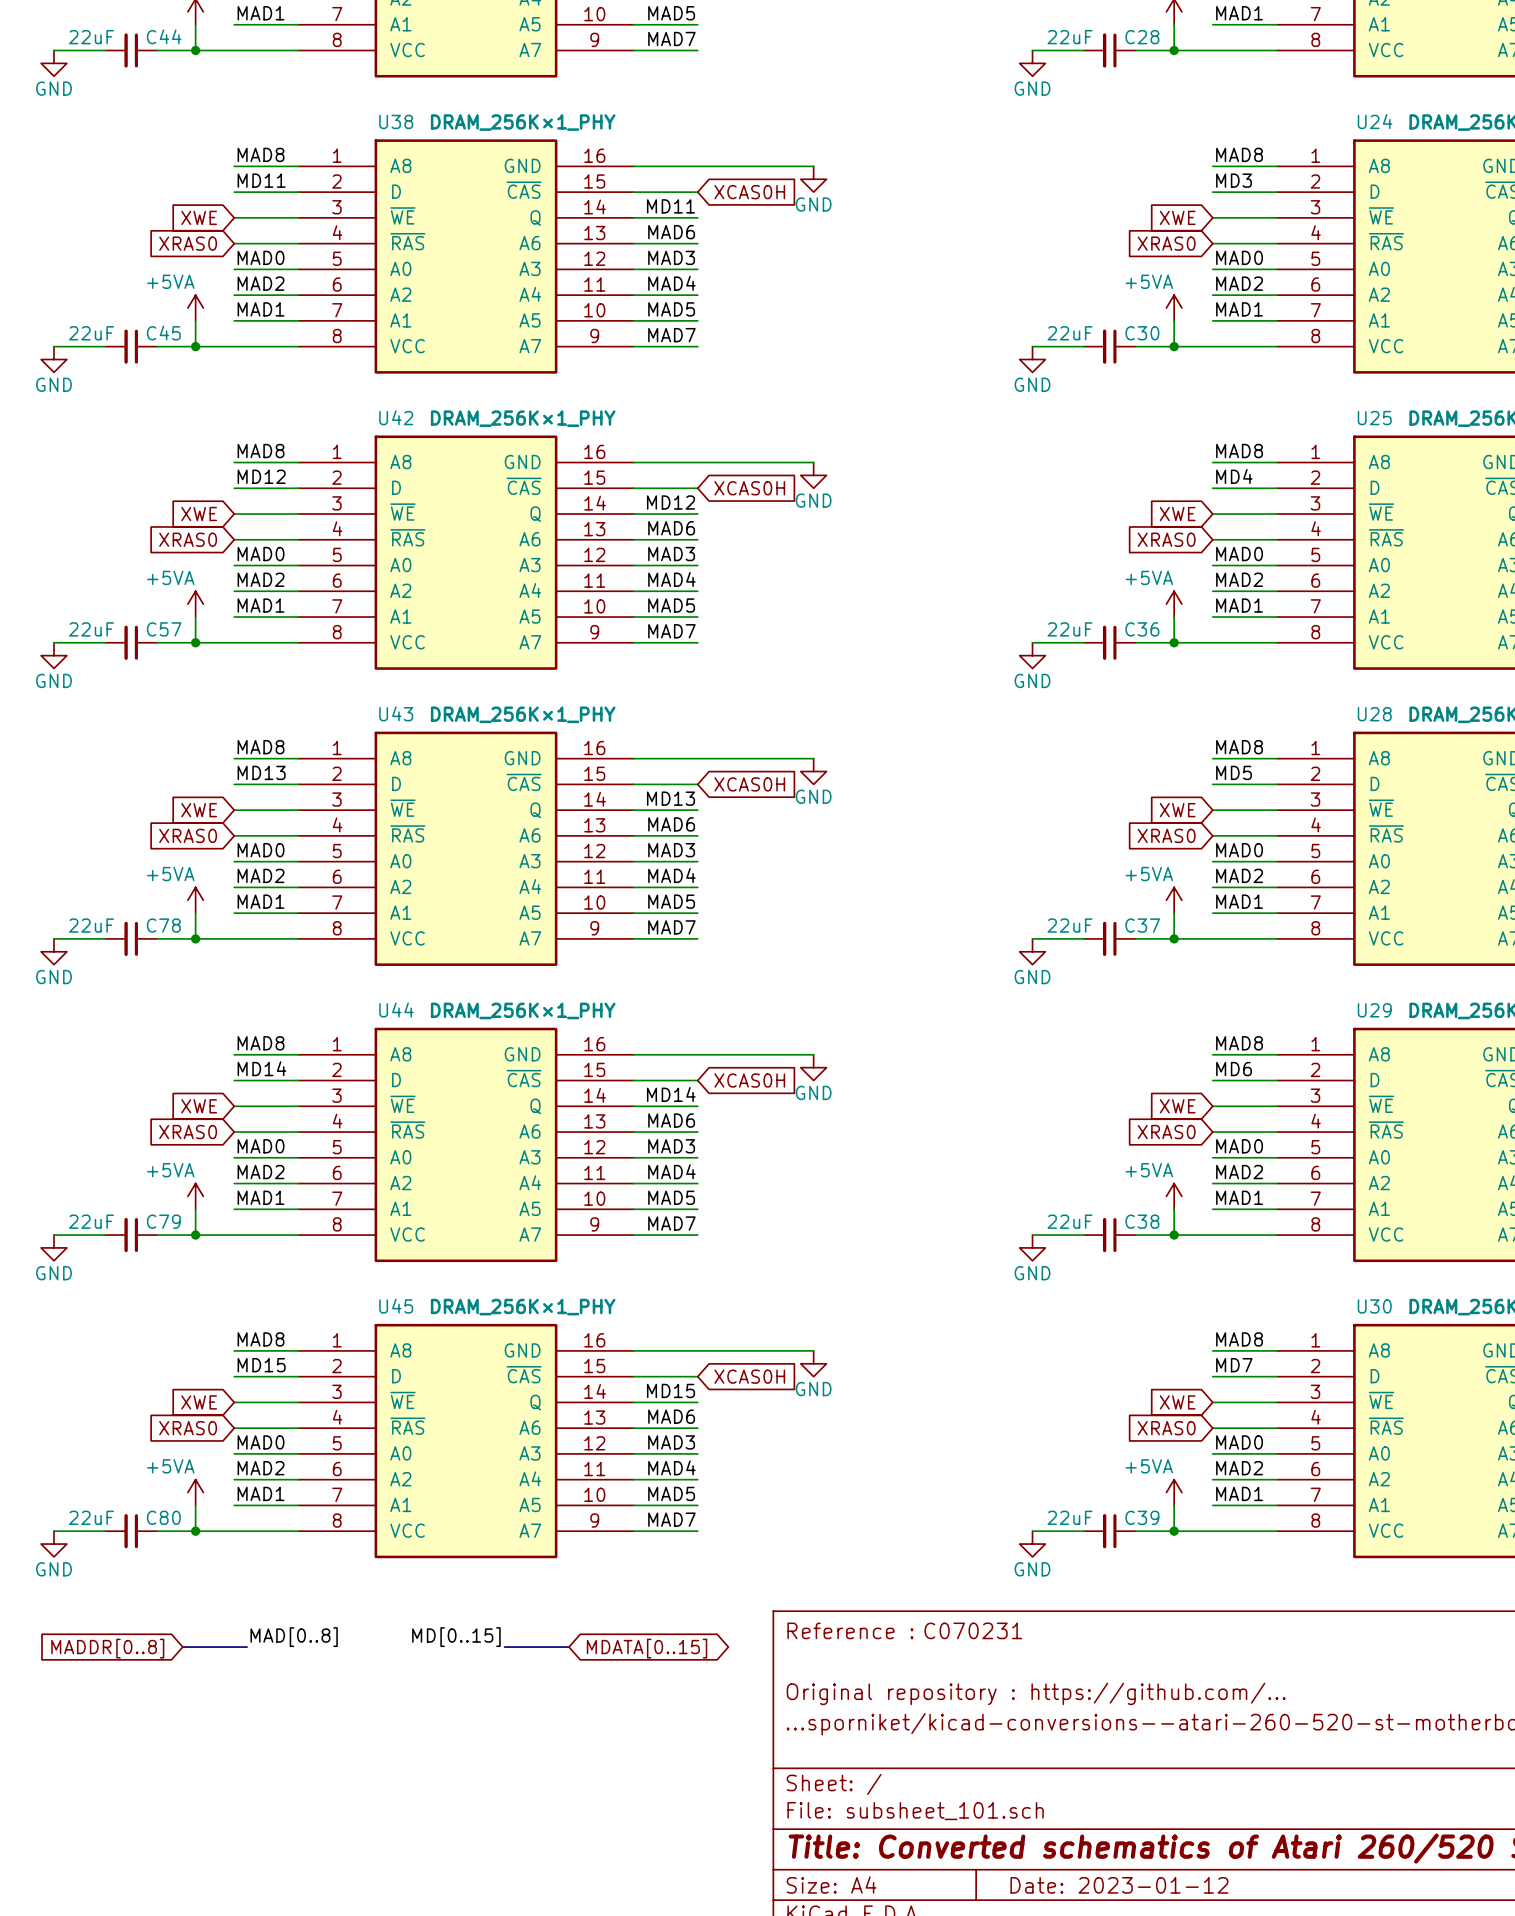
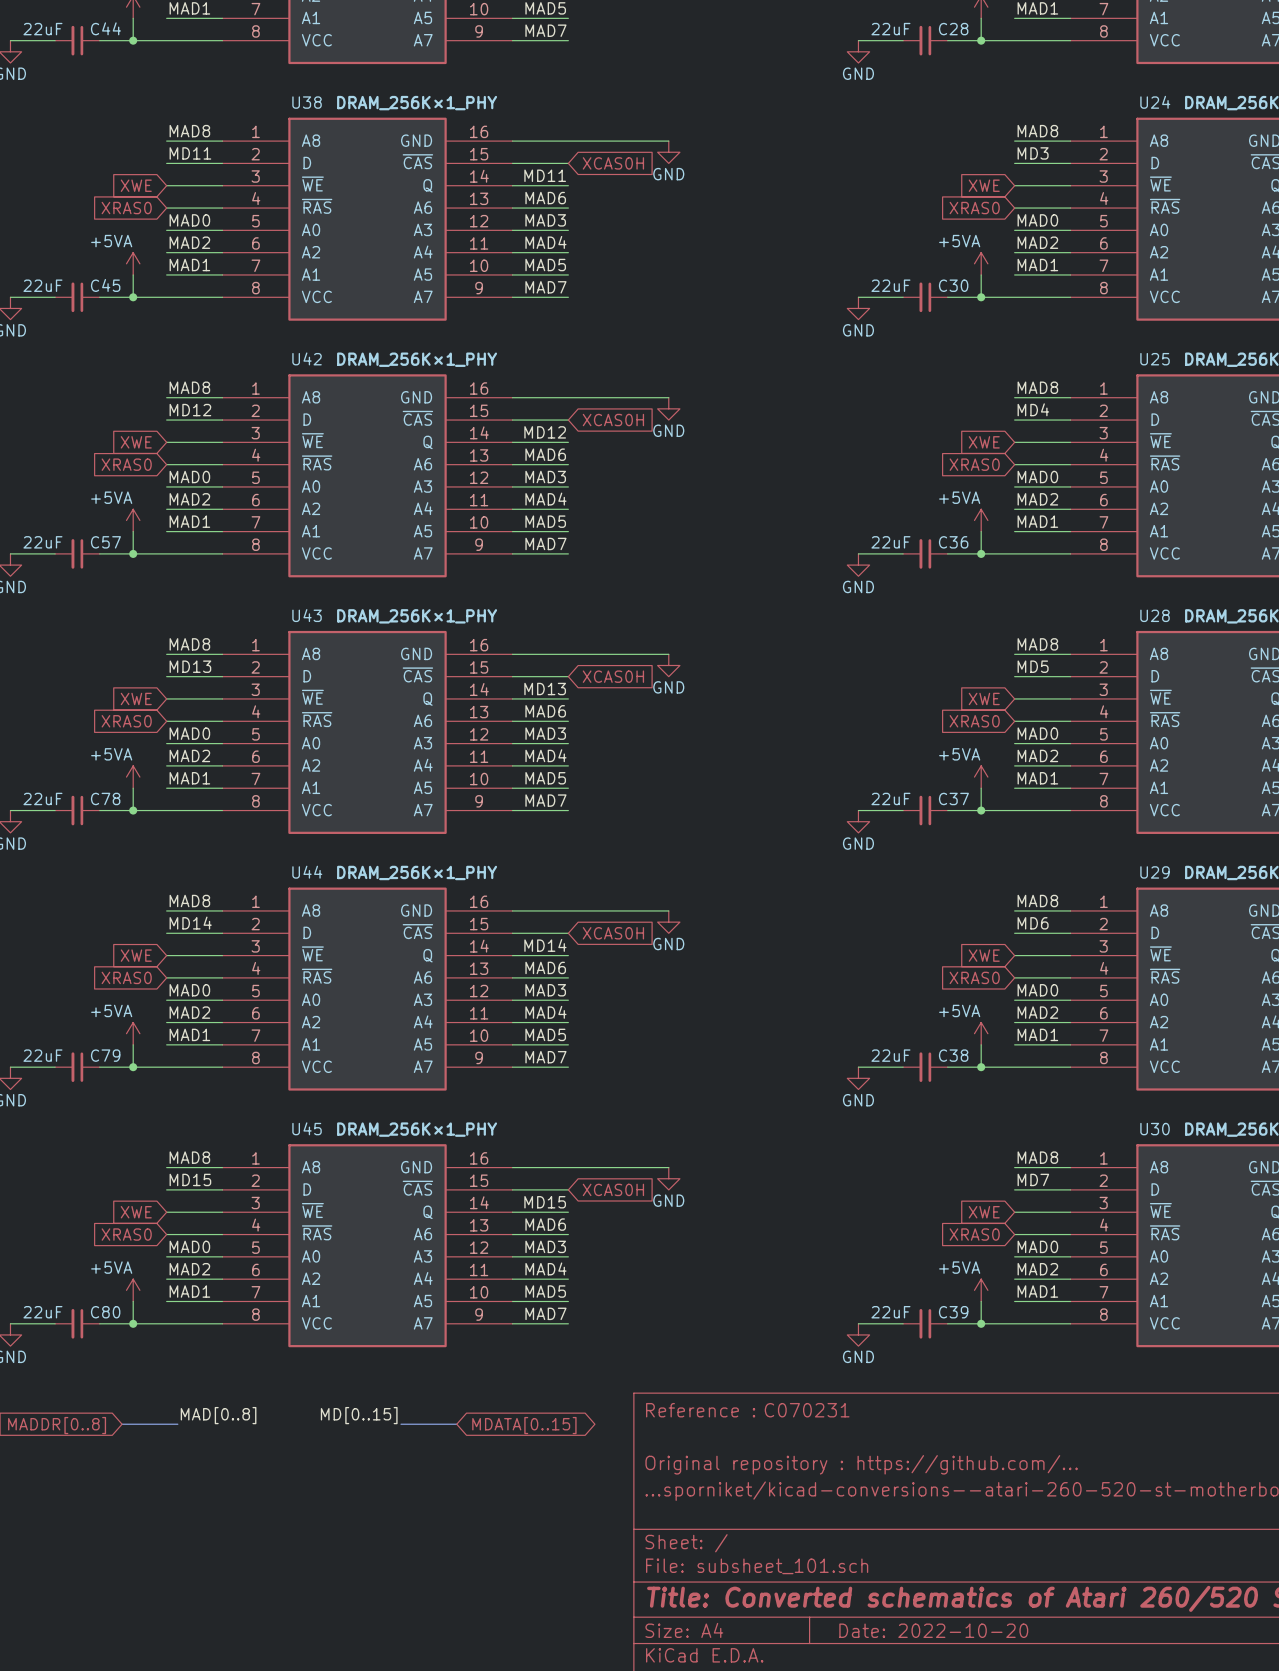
title block: Date: 2023-01-12 (1119, 1885) -> Date: 2022-10-20 (933, 1630)

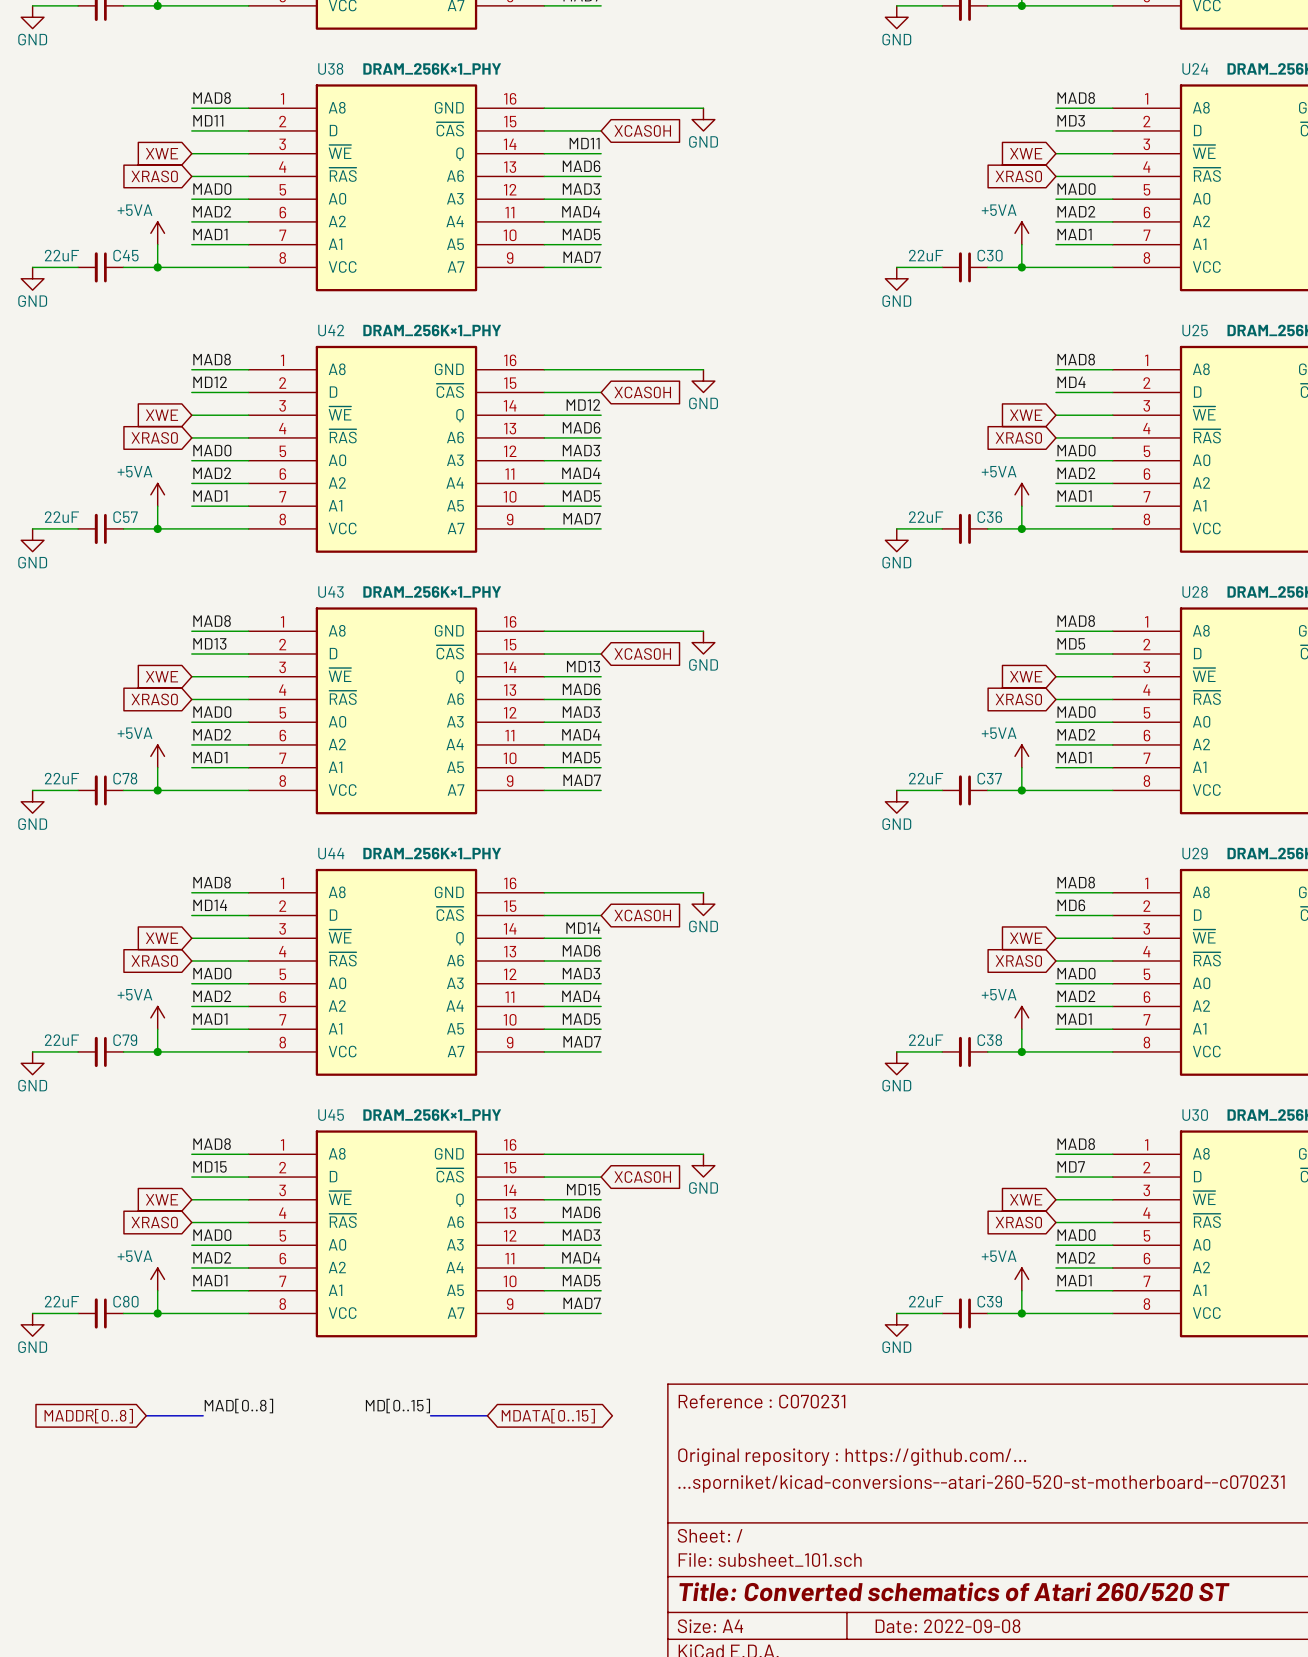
title block: Date: 2022-10-20 (933, 1630) -> Date: 2022-09-08 (947, 1626)

